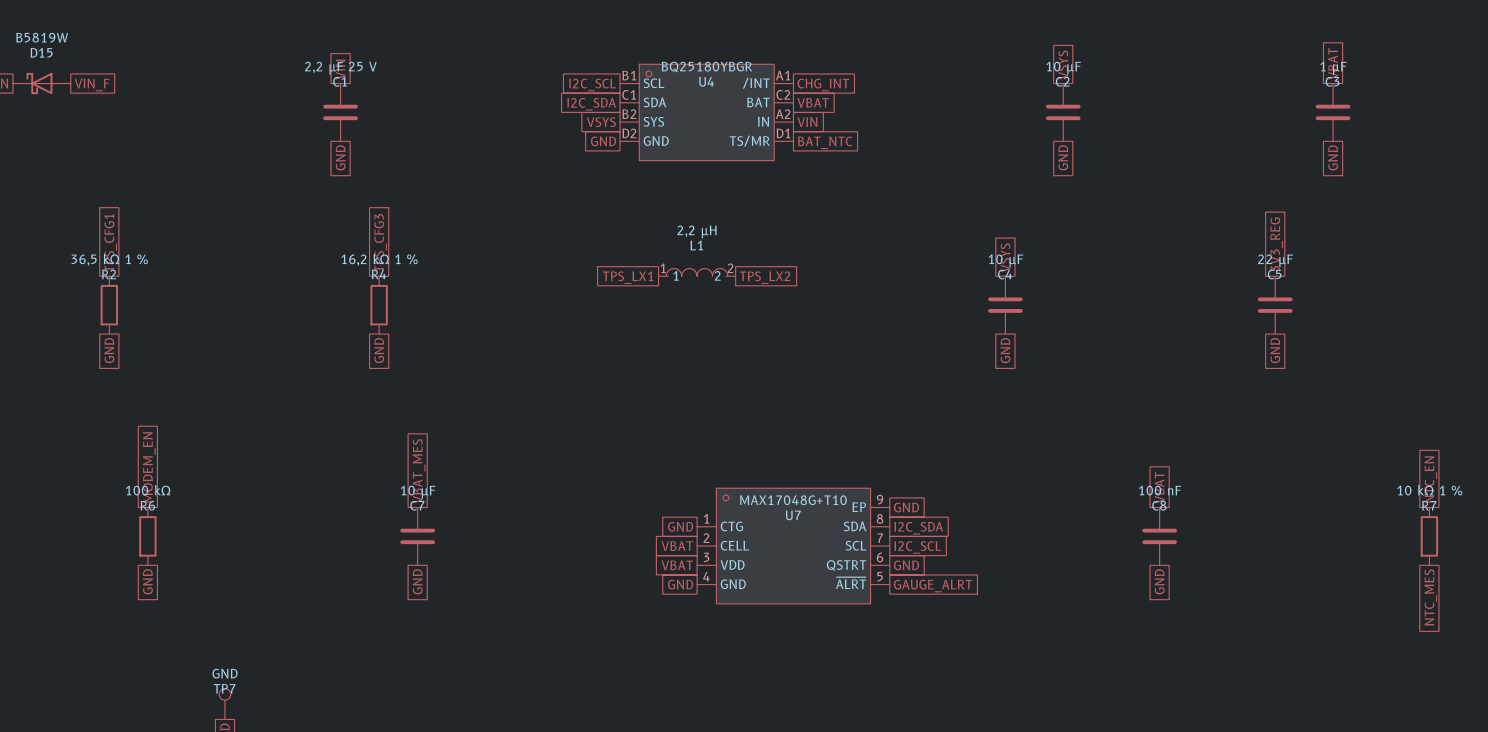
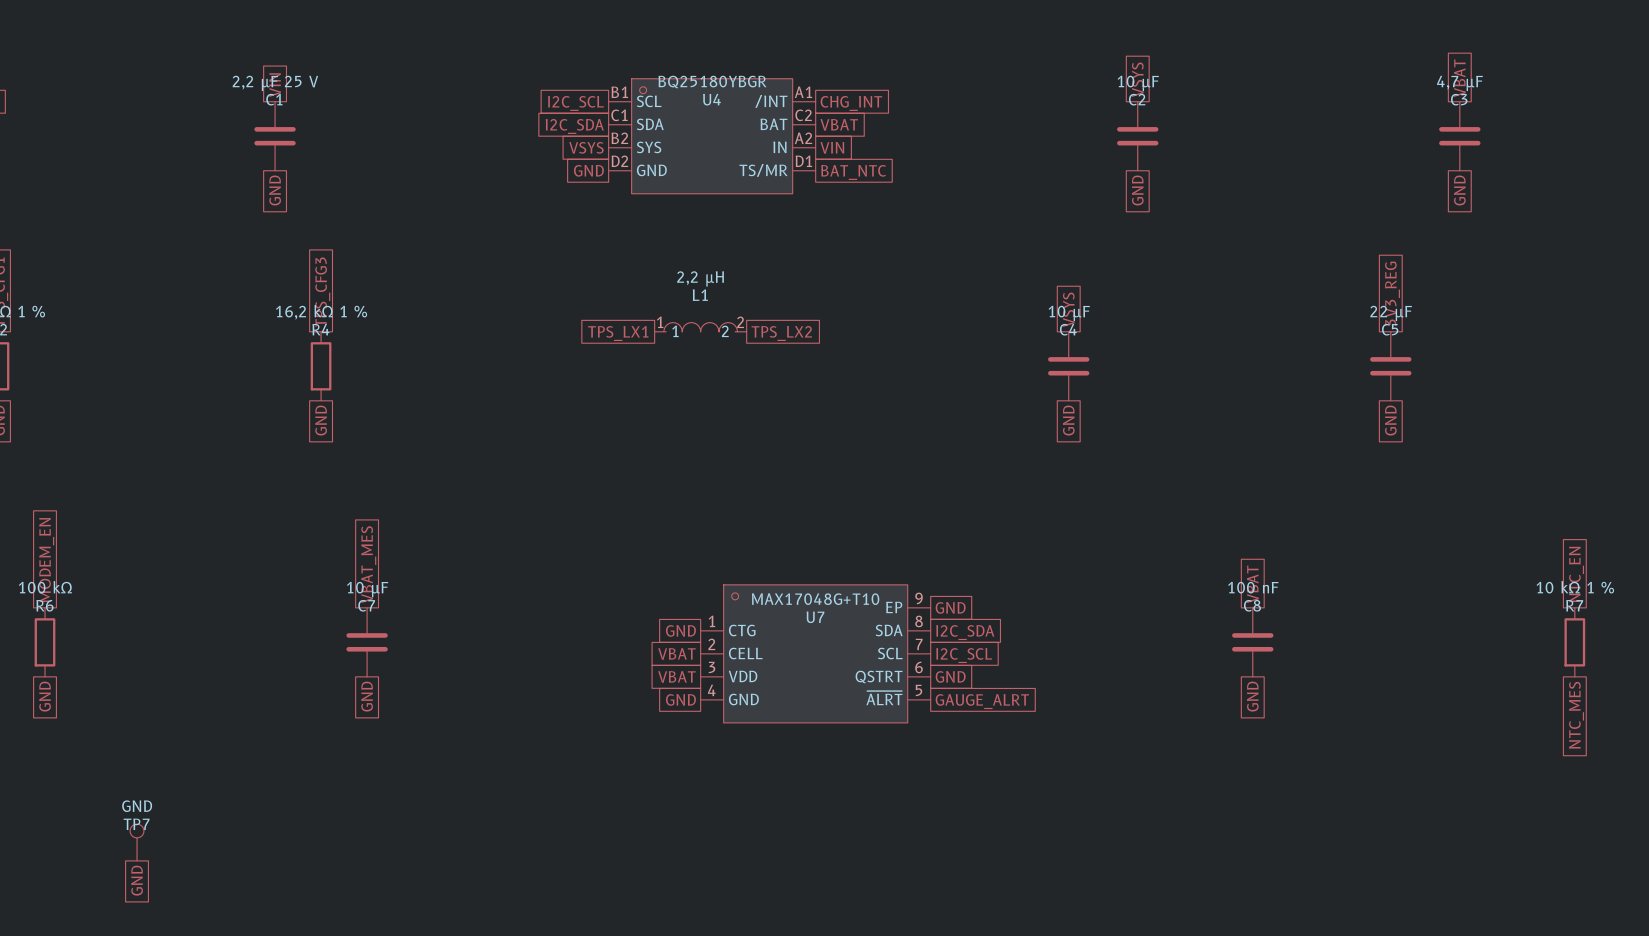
C3 value: 1 µF (1333, 68) -> 4,7 µF (1459, 83)

